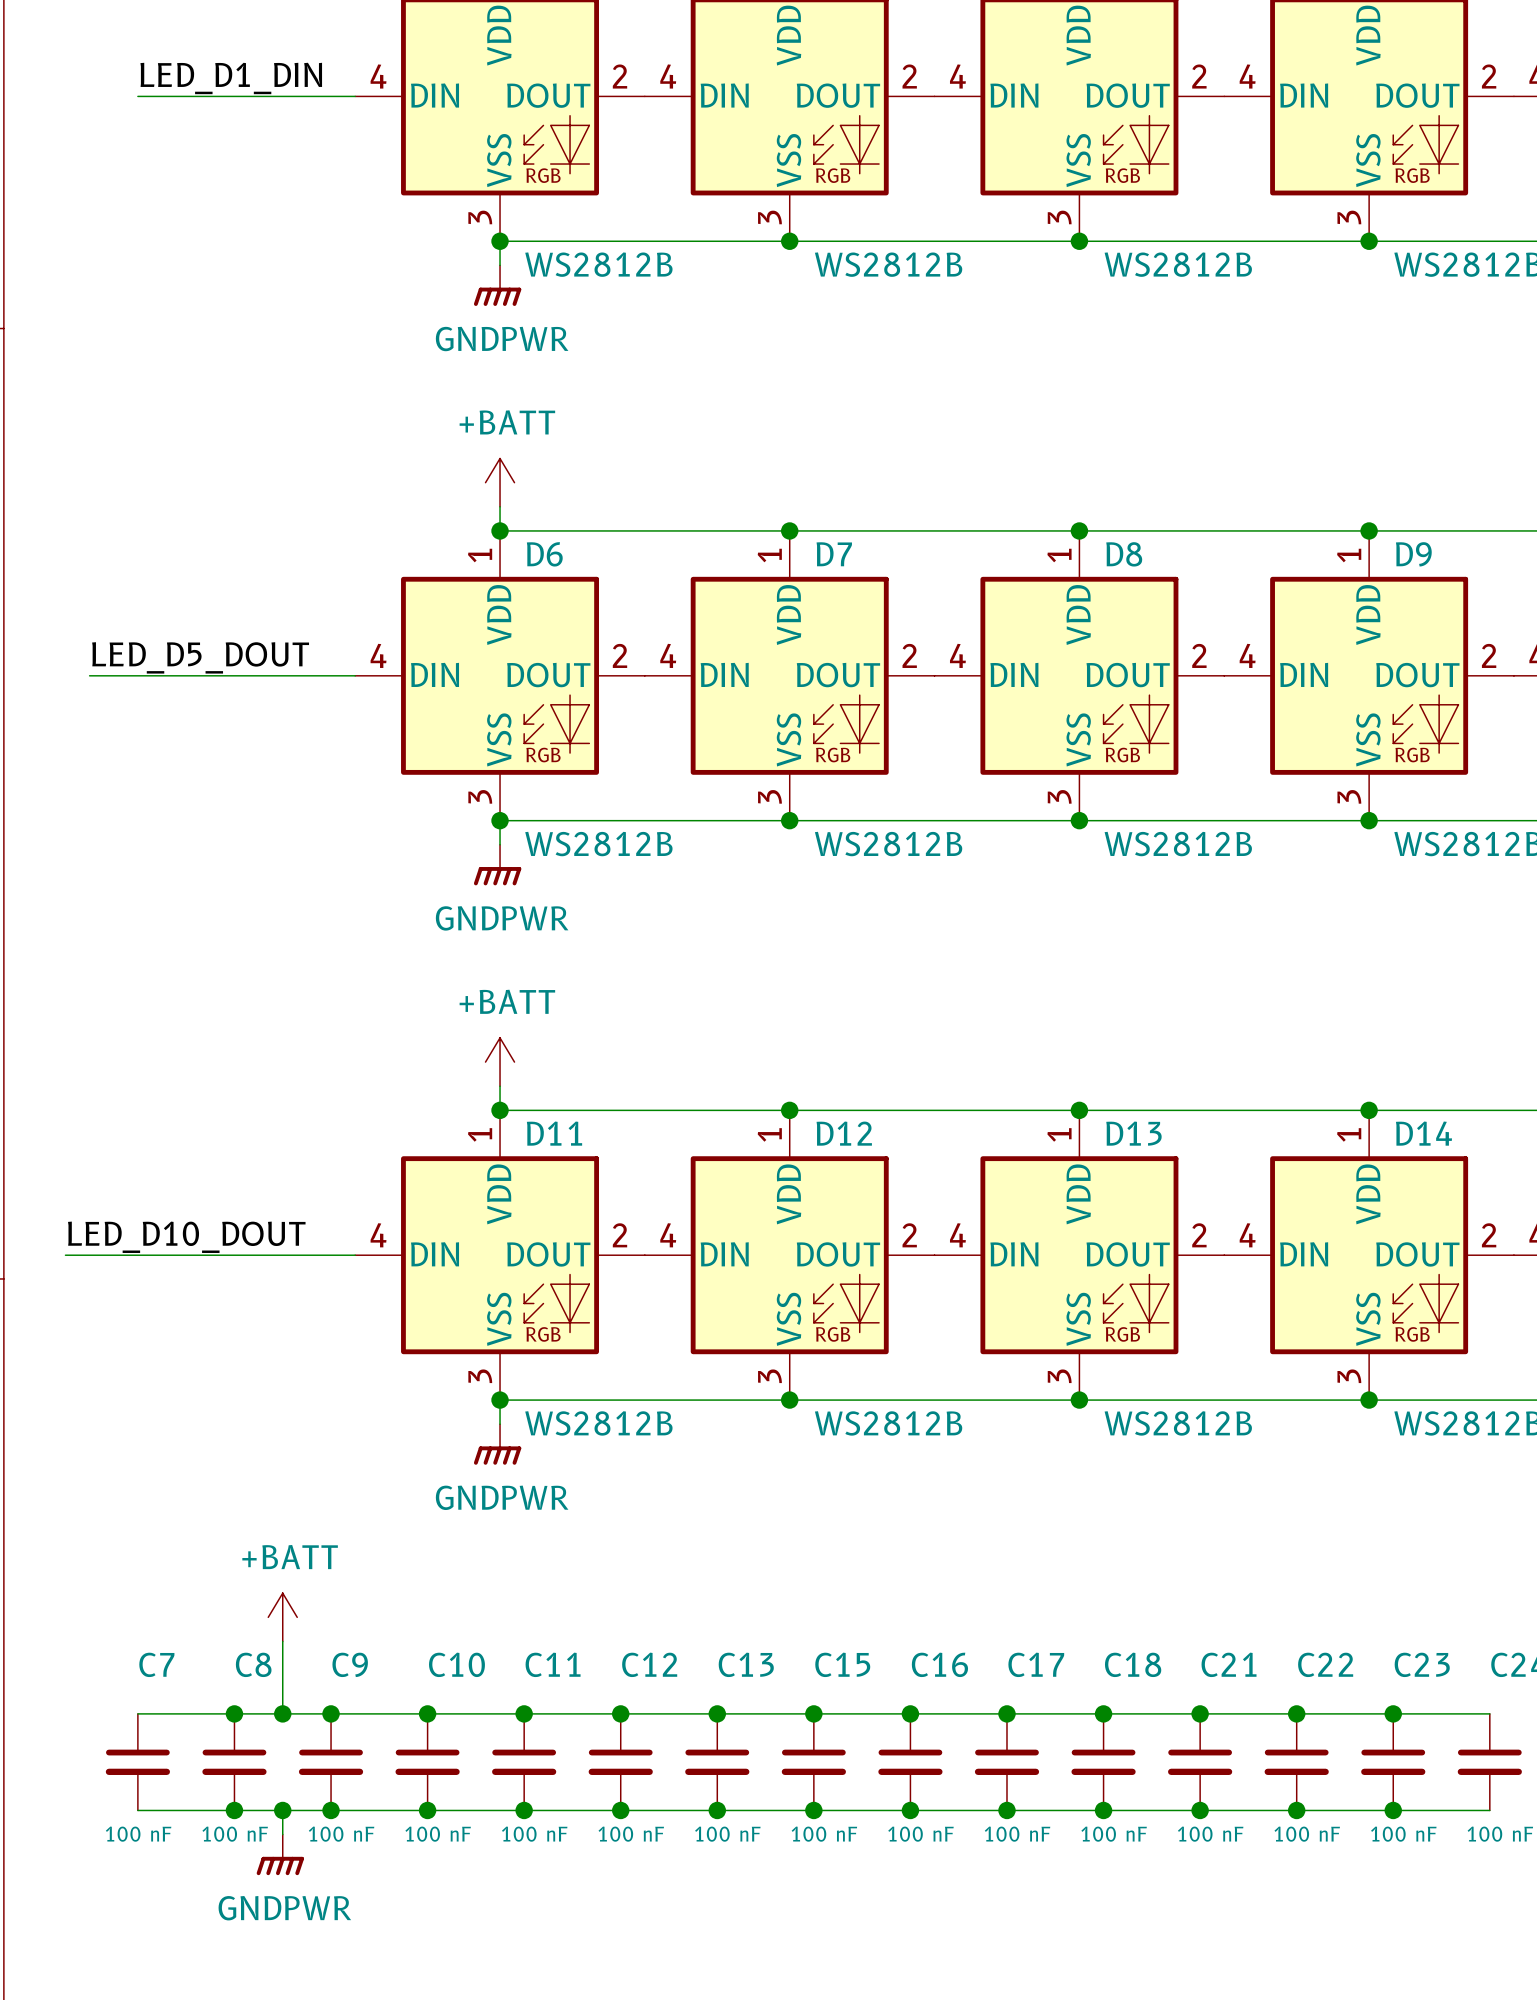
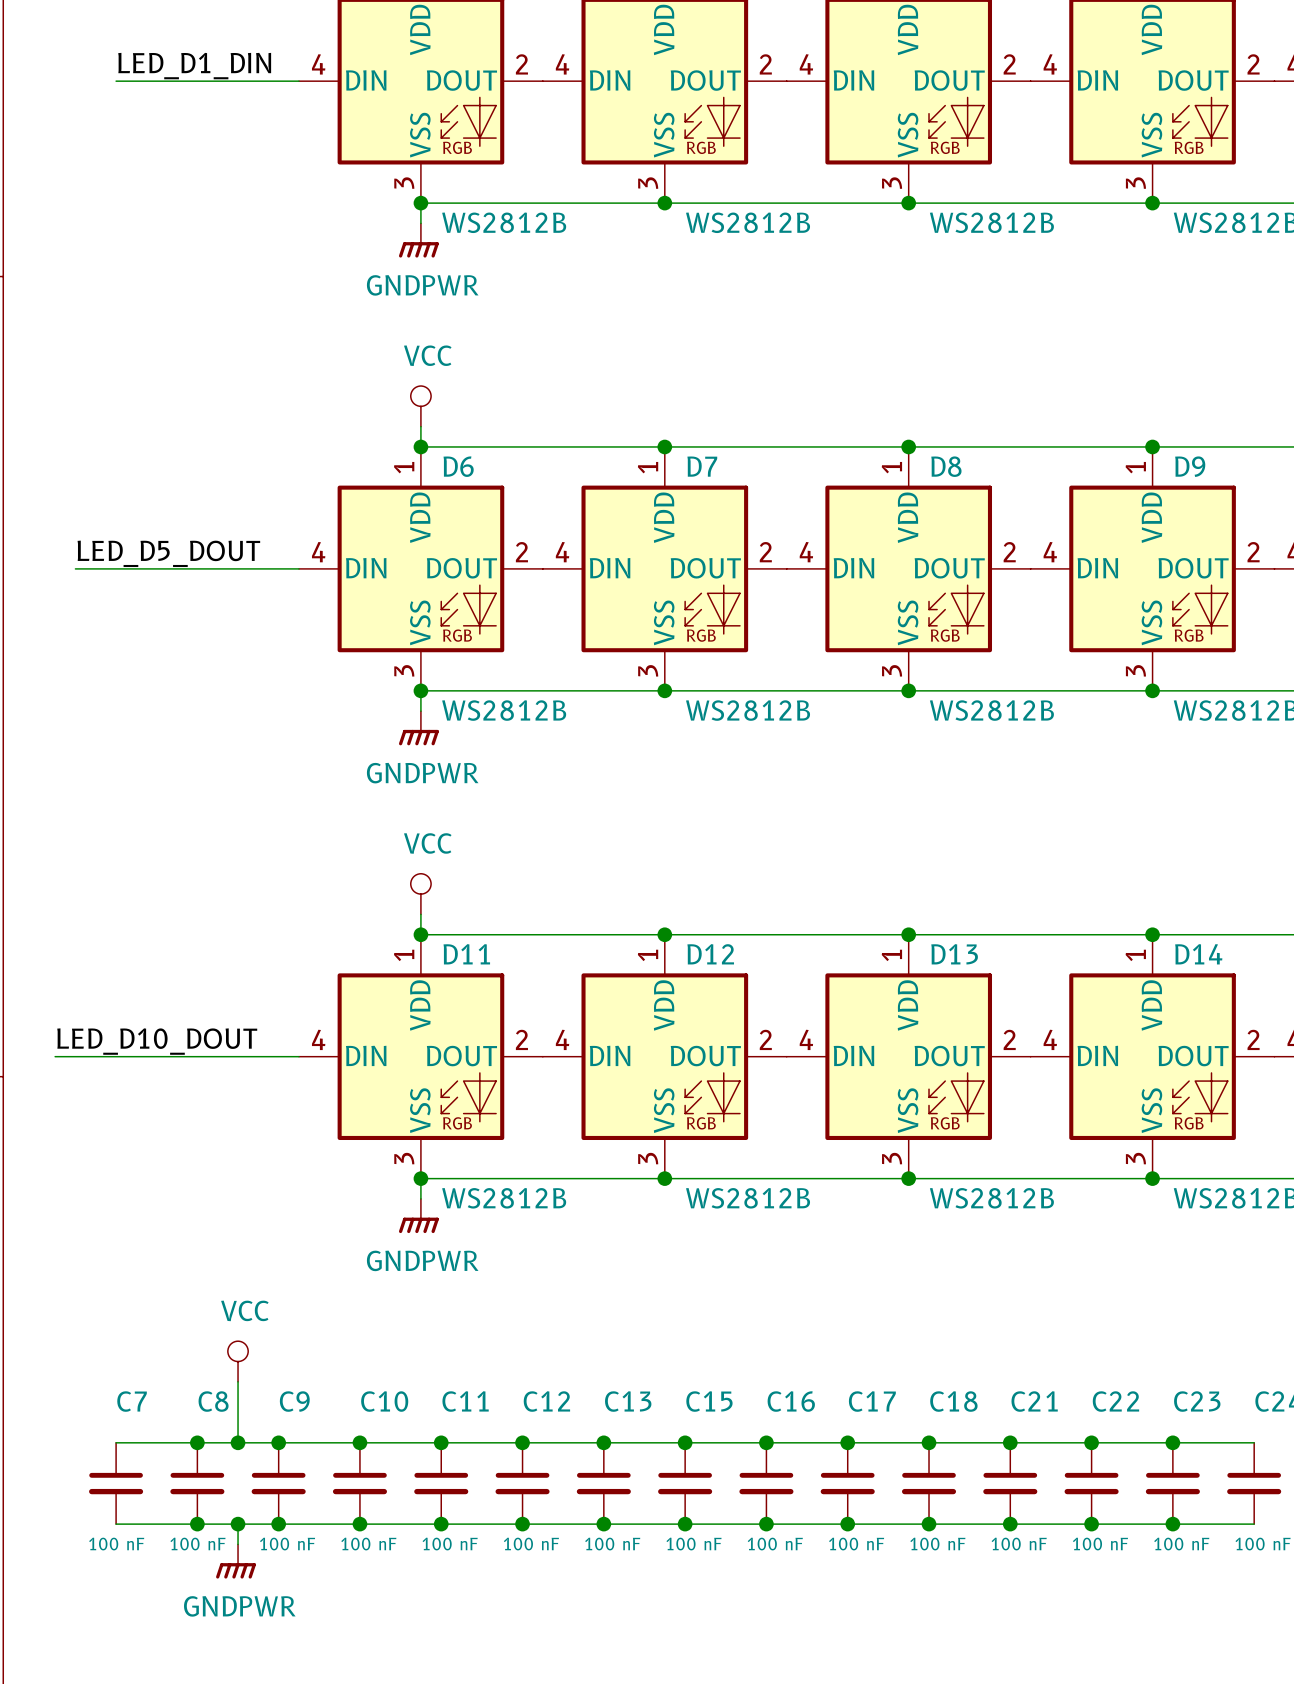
power symbol: +BATT (500, 482) -> VCC (420, 406)
power symbol: +BATT (500, 1062) -> VCC (420, 894)
power symbol: +BATT (282, 1617) -> VCC (238, 1361)

